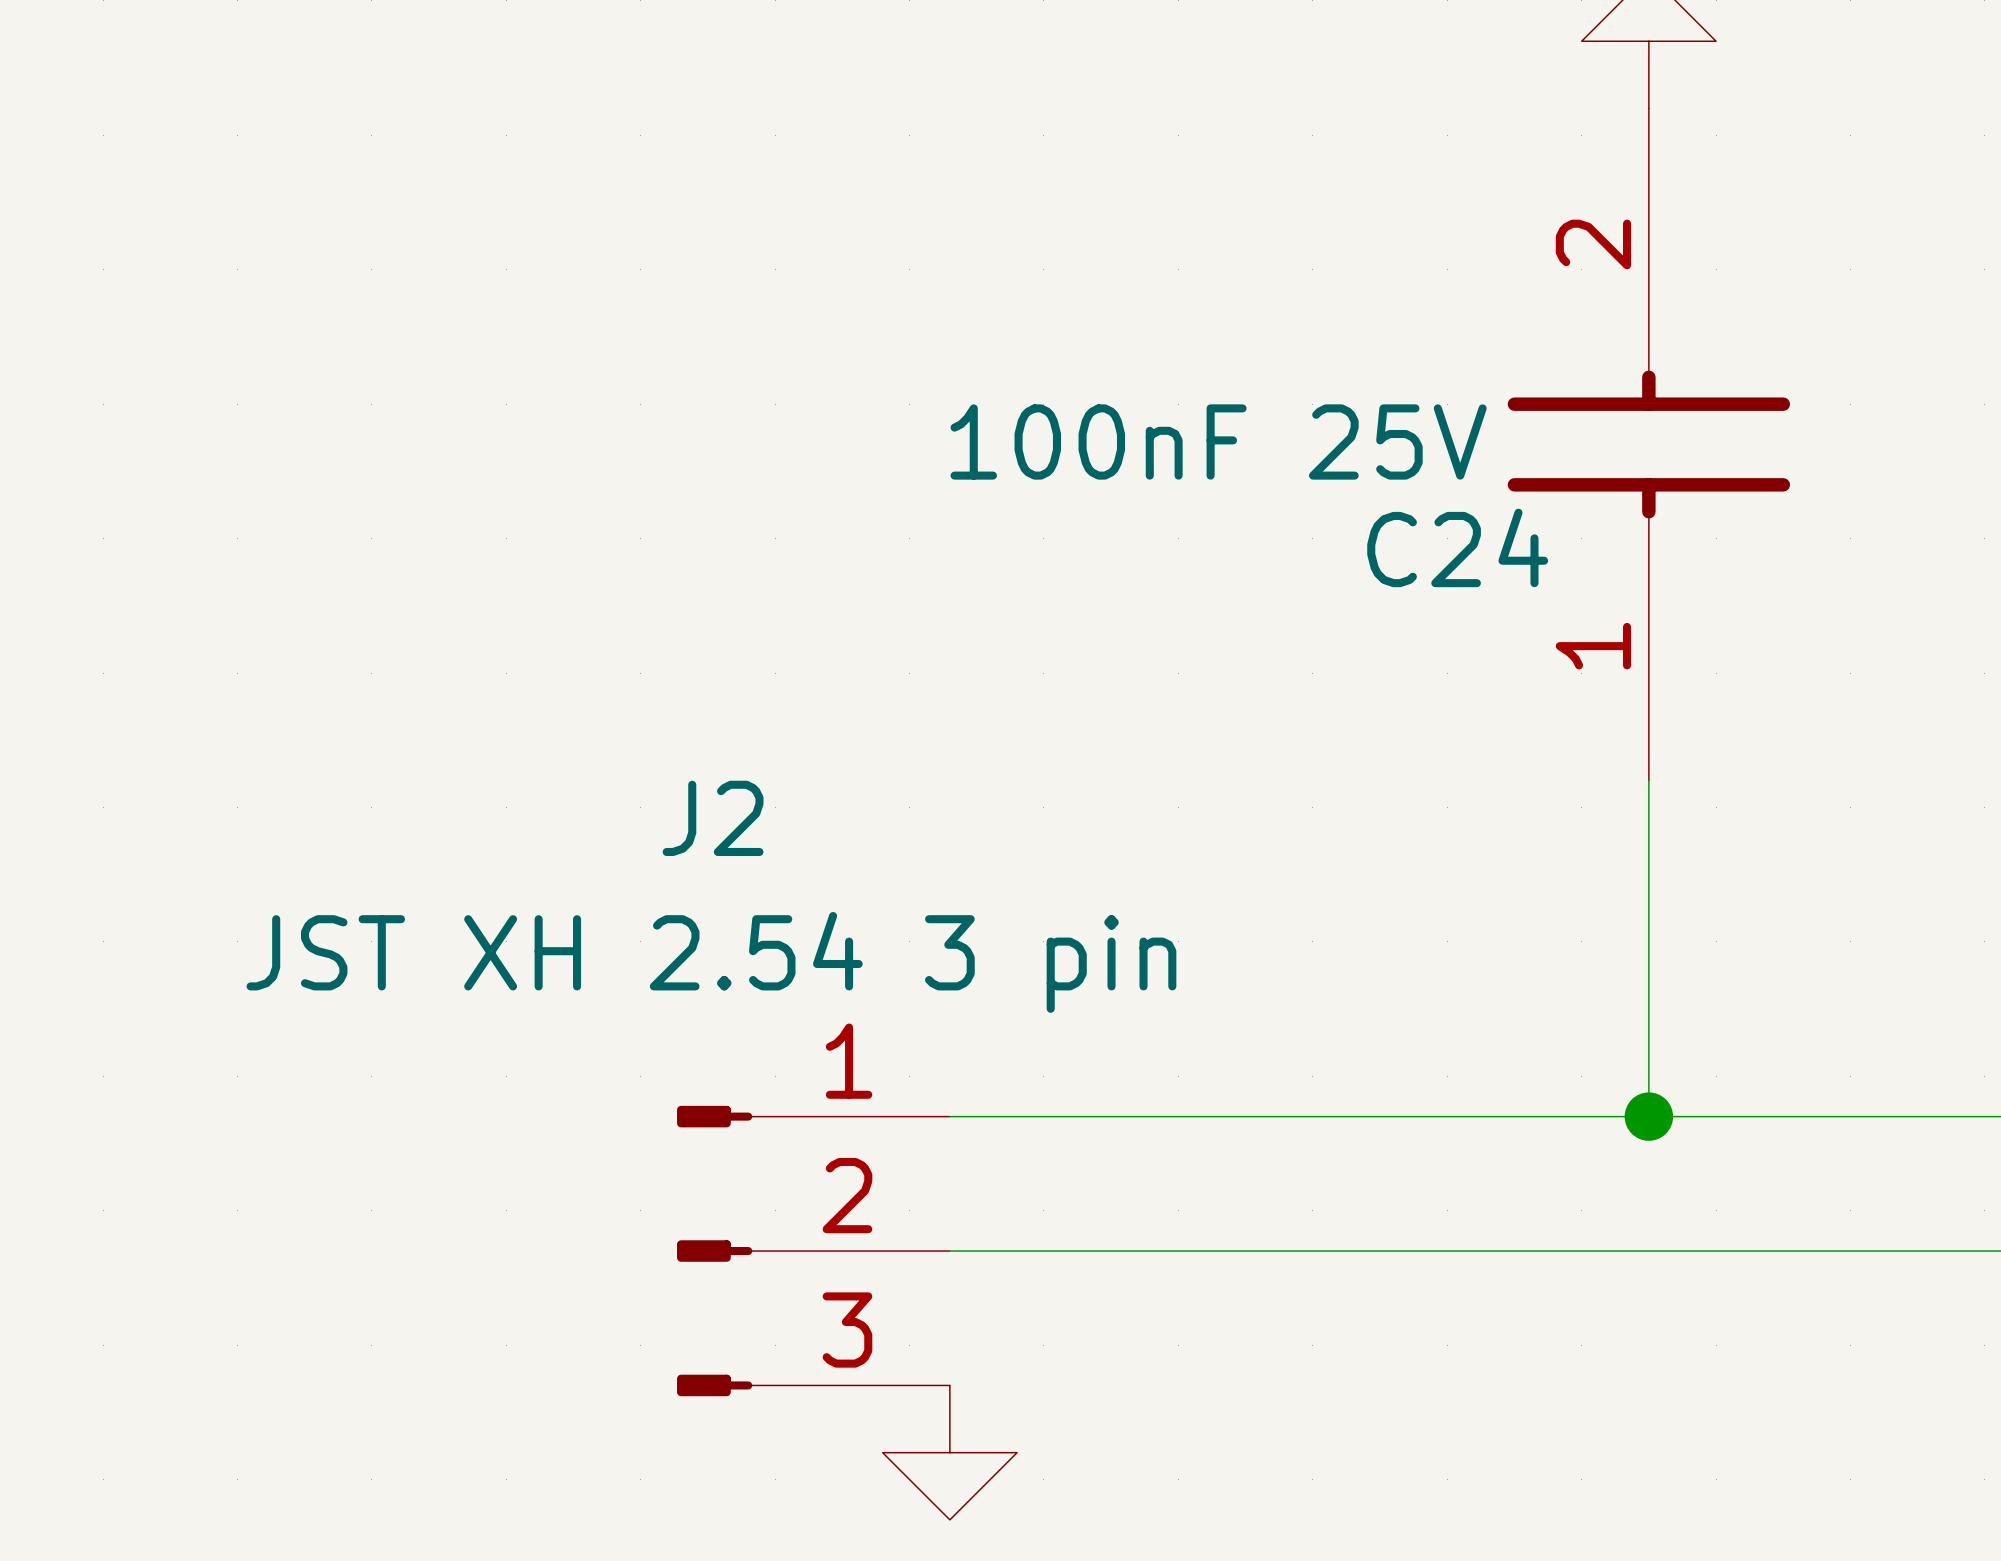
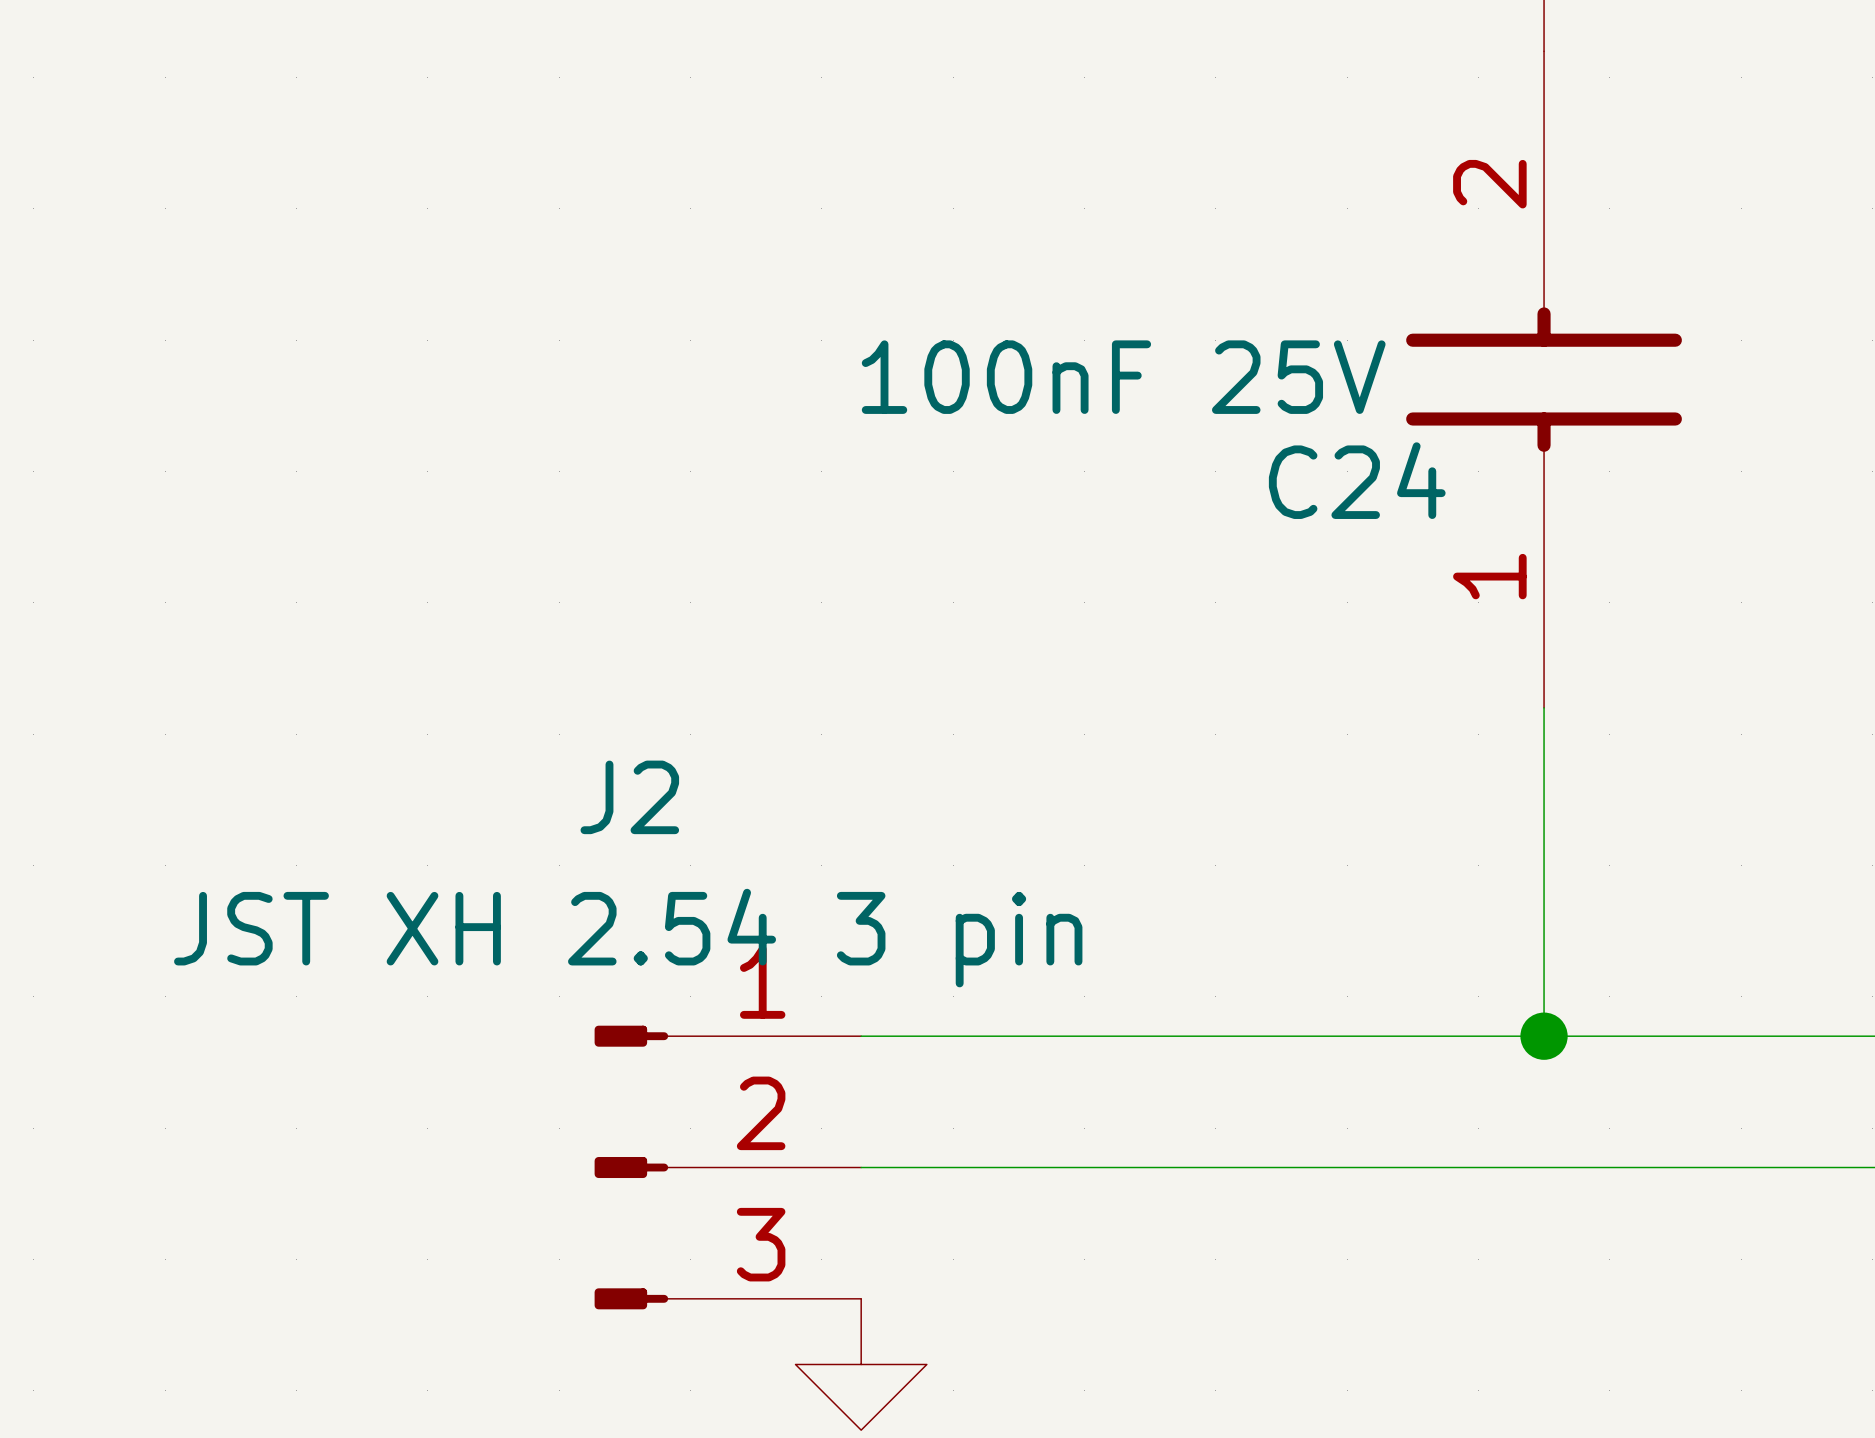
J2 name position: J2 (713, 818) -> J2 (629, 797)
J2 value position: JST XH 2.54 3 pin (711, 962) -> JST XH 2.54 3 pin (628, 938)

